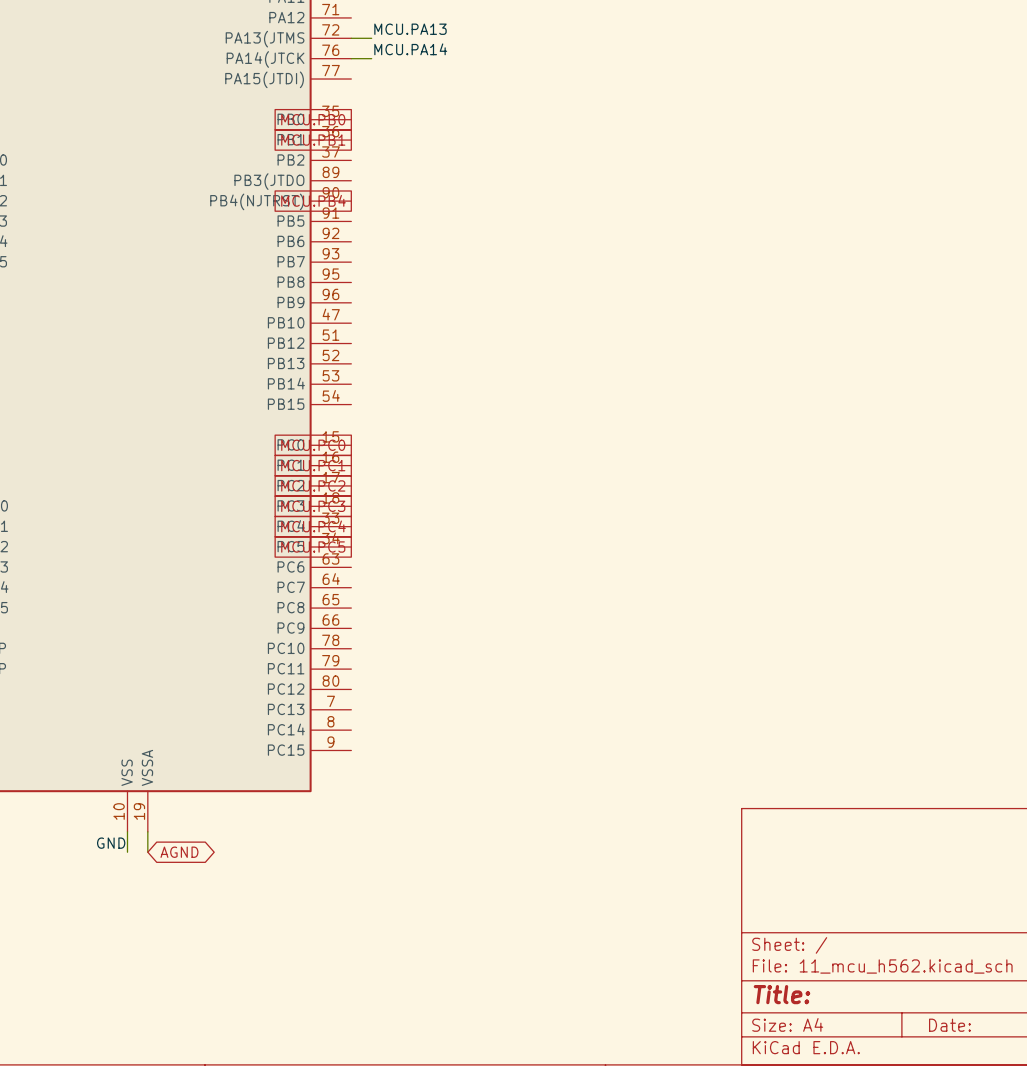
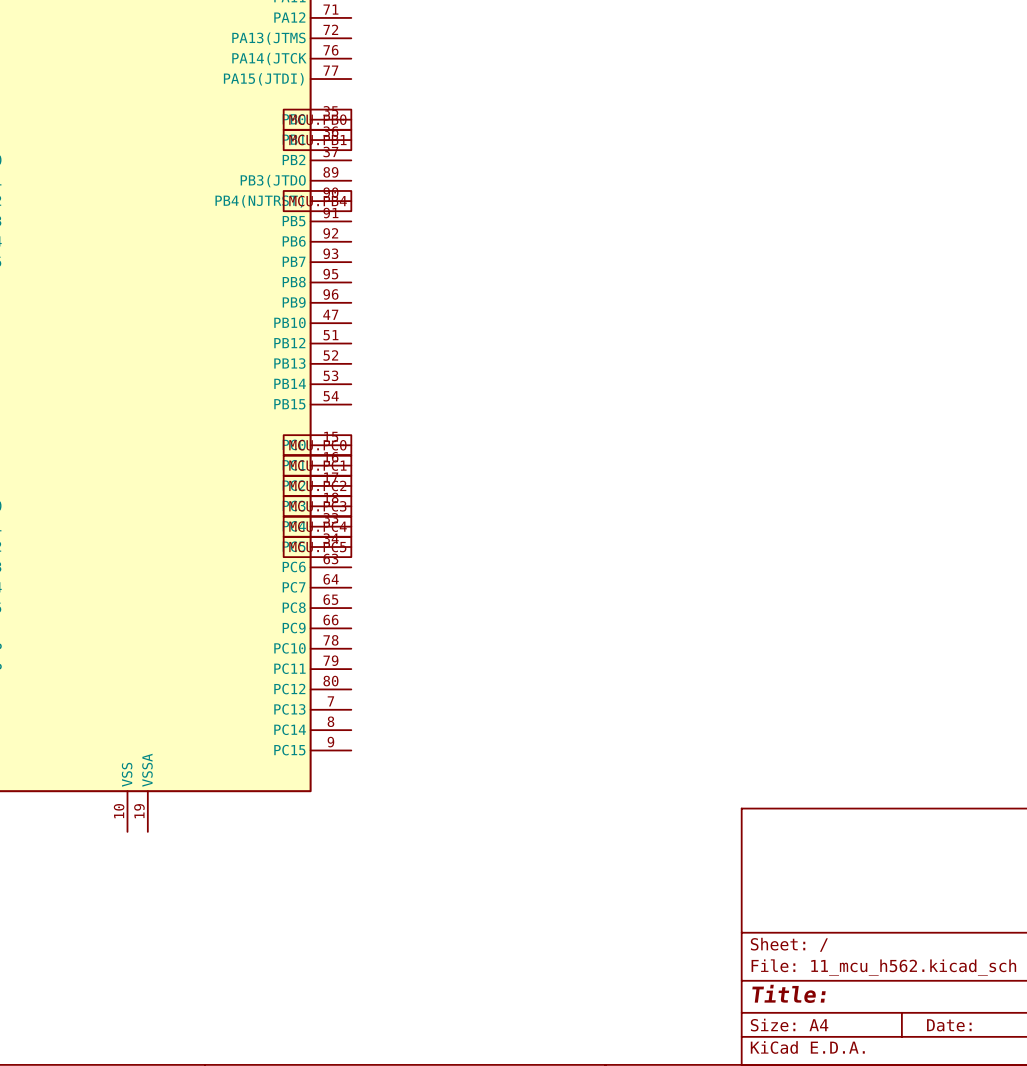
label: MCU.PA13 (410, 29) -> none
wire: (351, 38) (371, 38) -> none
label: MCU.PA14 (410, 49) -> none
wire: (351, 58) (371, 58) -> none
wire: (127, 831) (127, 852) -> none
wire: (147, 831) (147, 852) -> none
label: GND (111, 843) -> none
global label: AGND (179, 852) -> none

